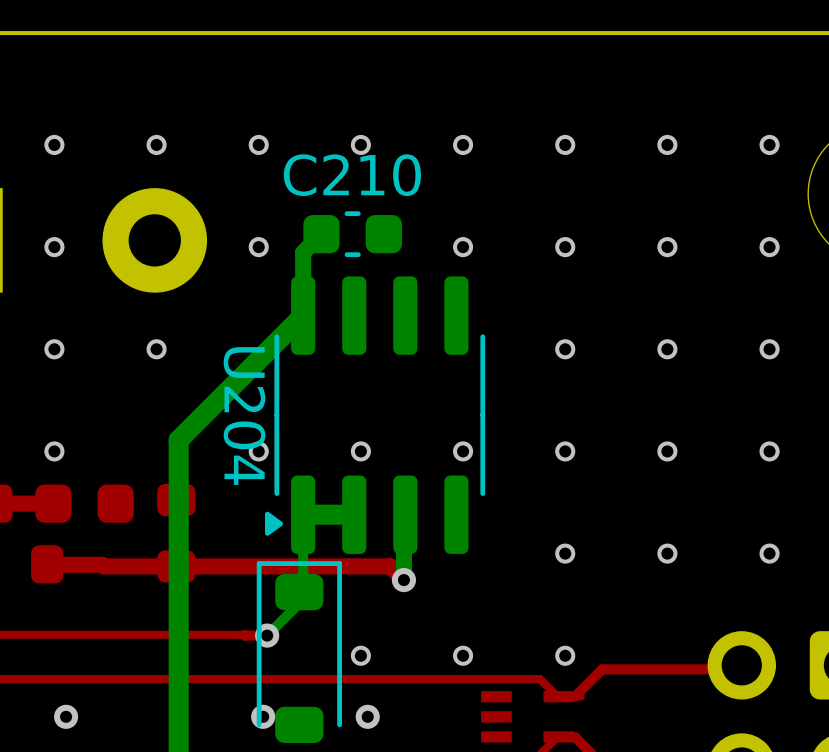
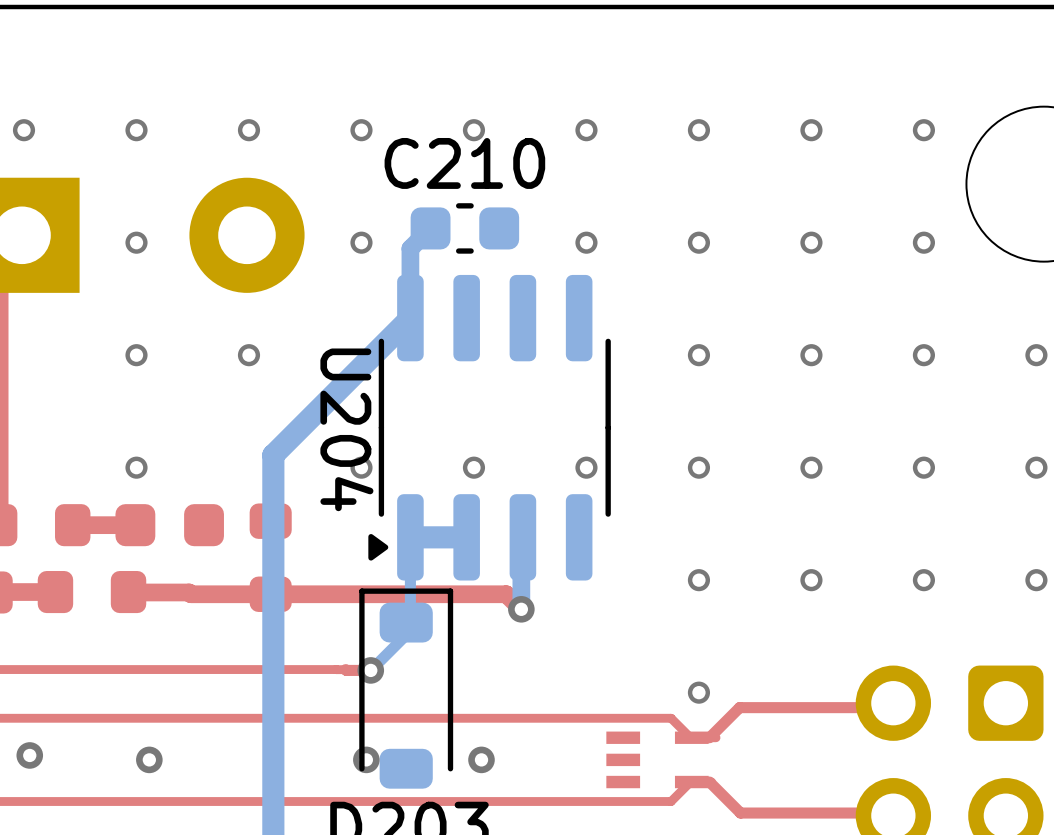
via: (360, 655) -> none
via: (463, 655) -> none

